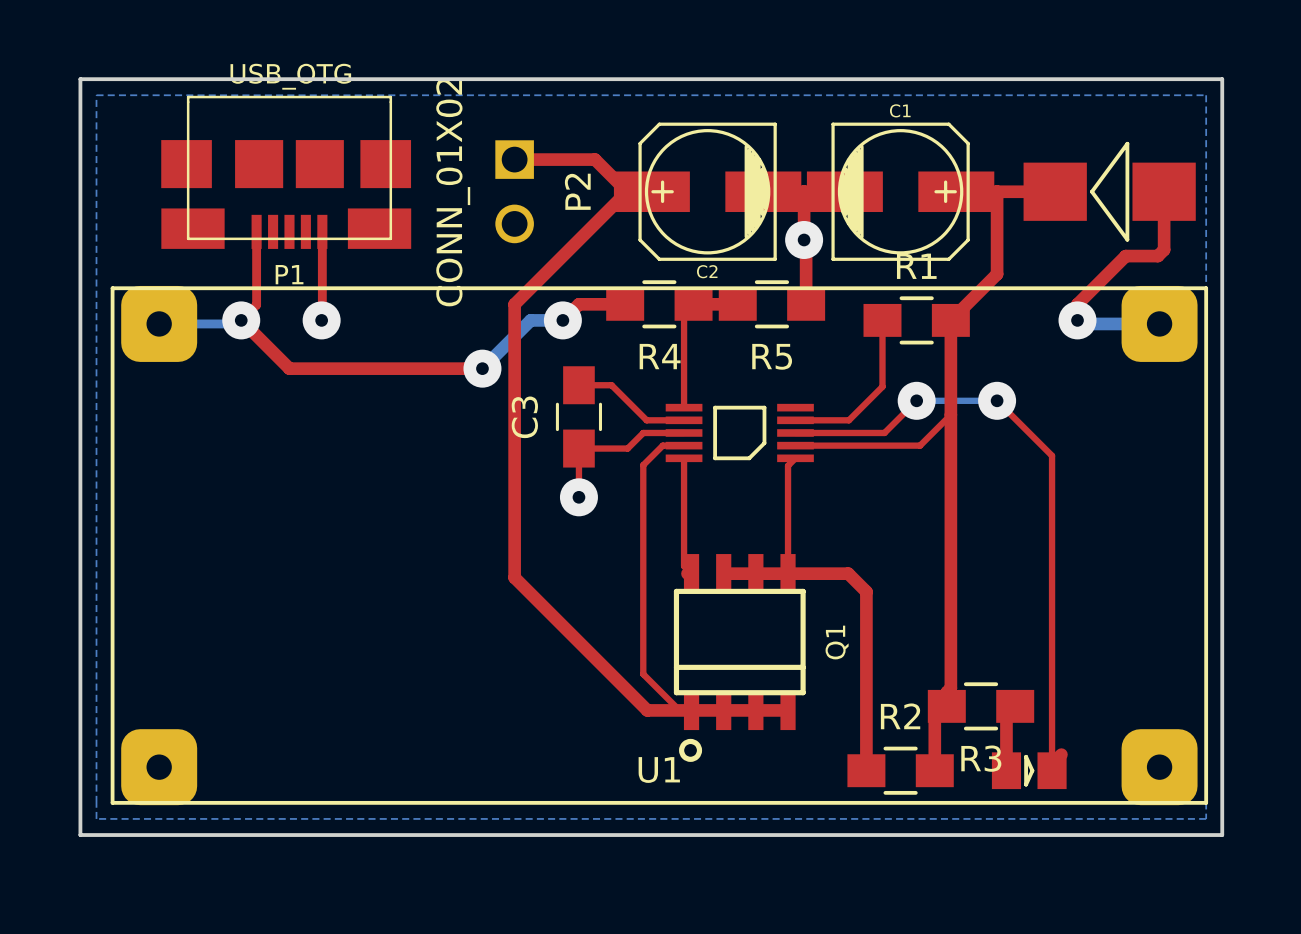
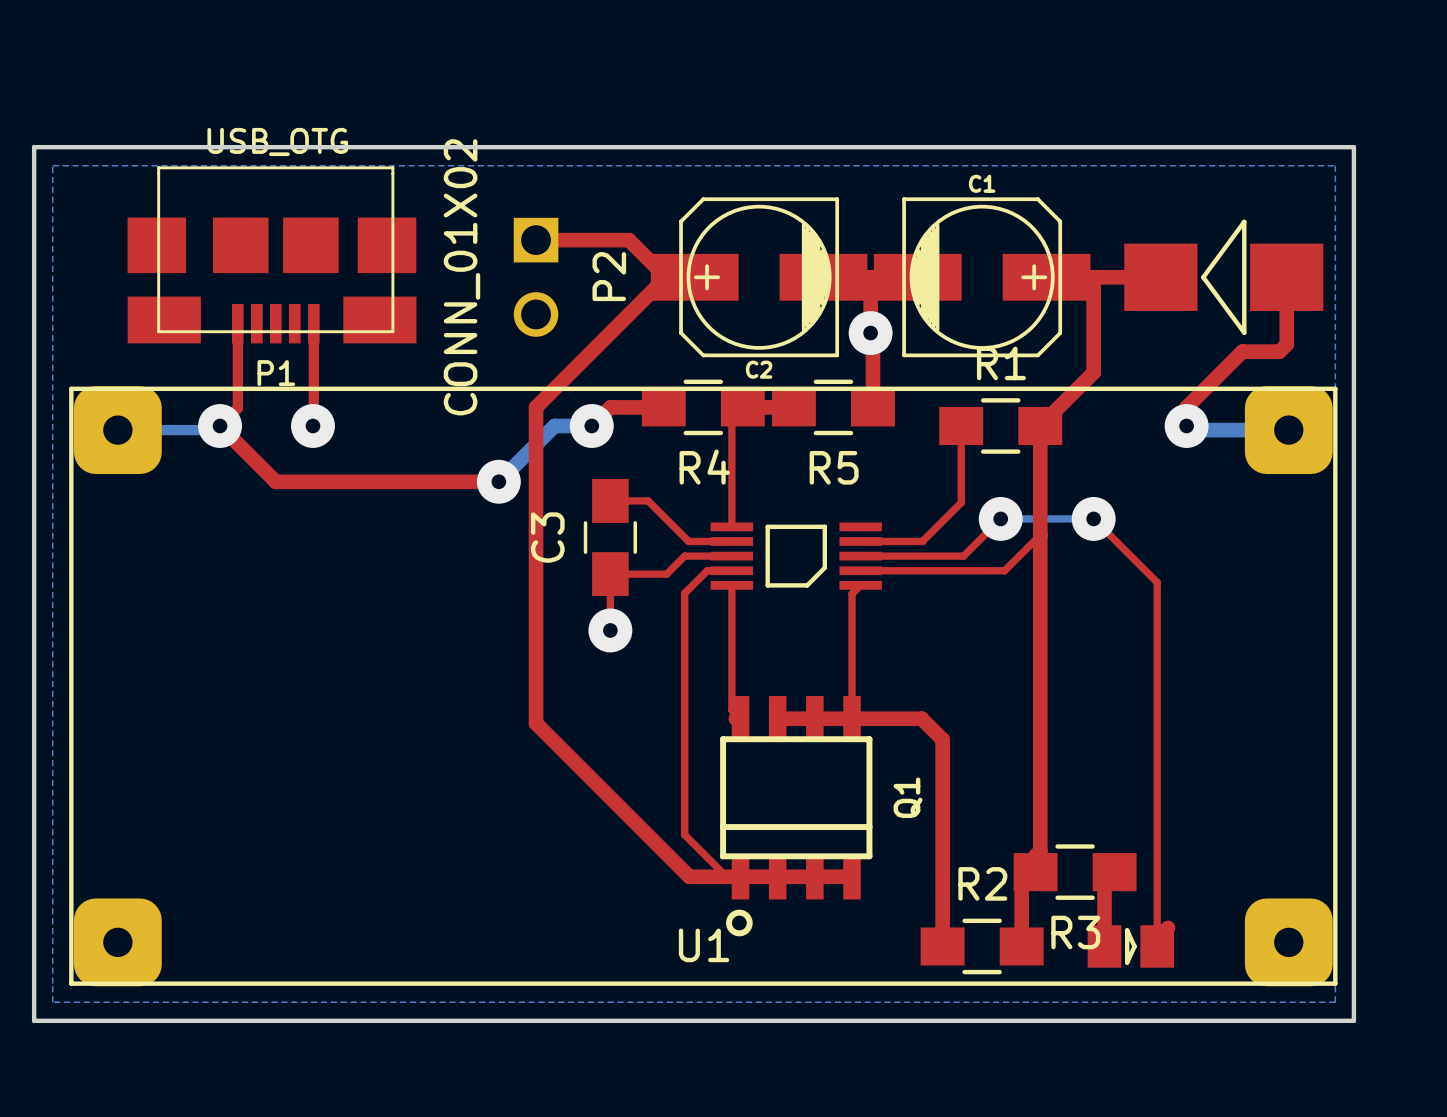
U1 footprint: [110, 285, 1209, 806] -> [69, 386, 1338, 987]

